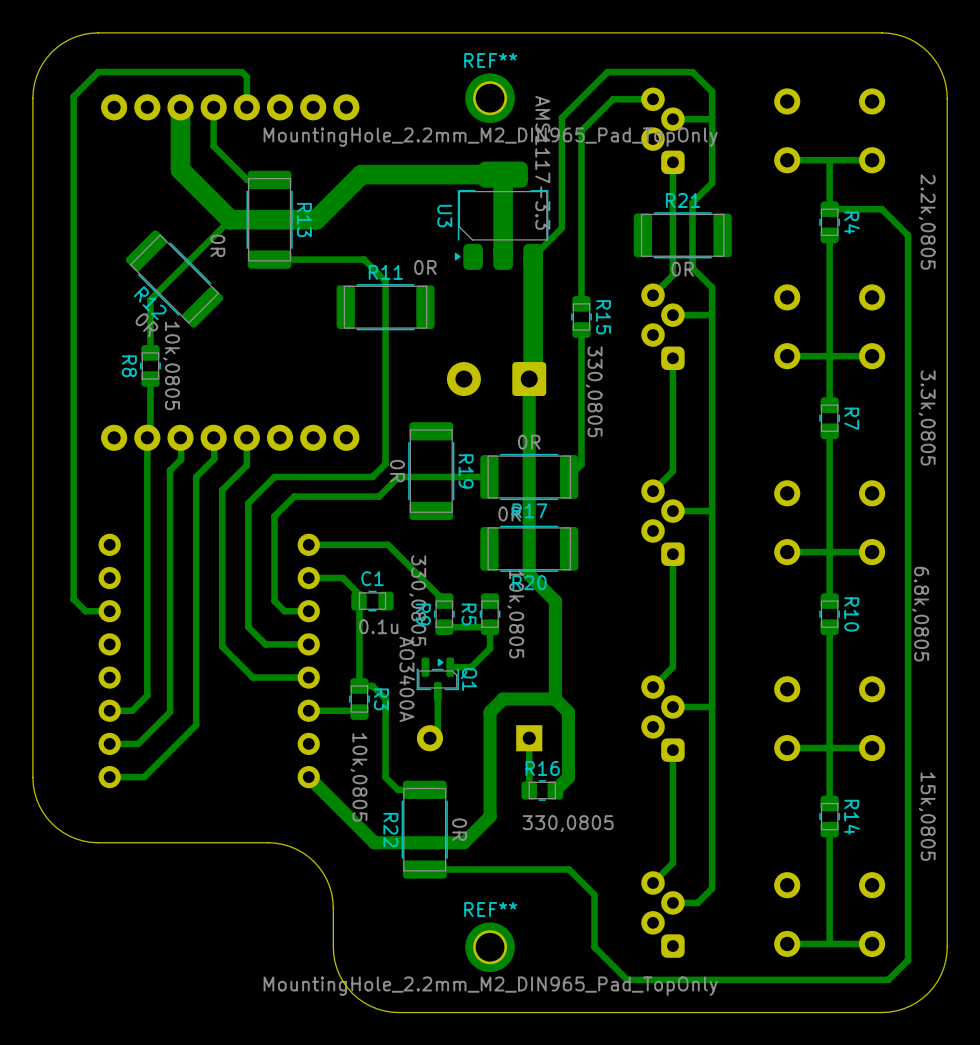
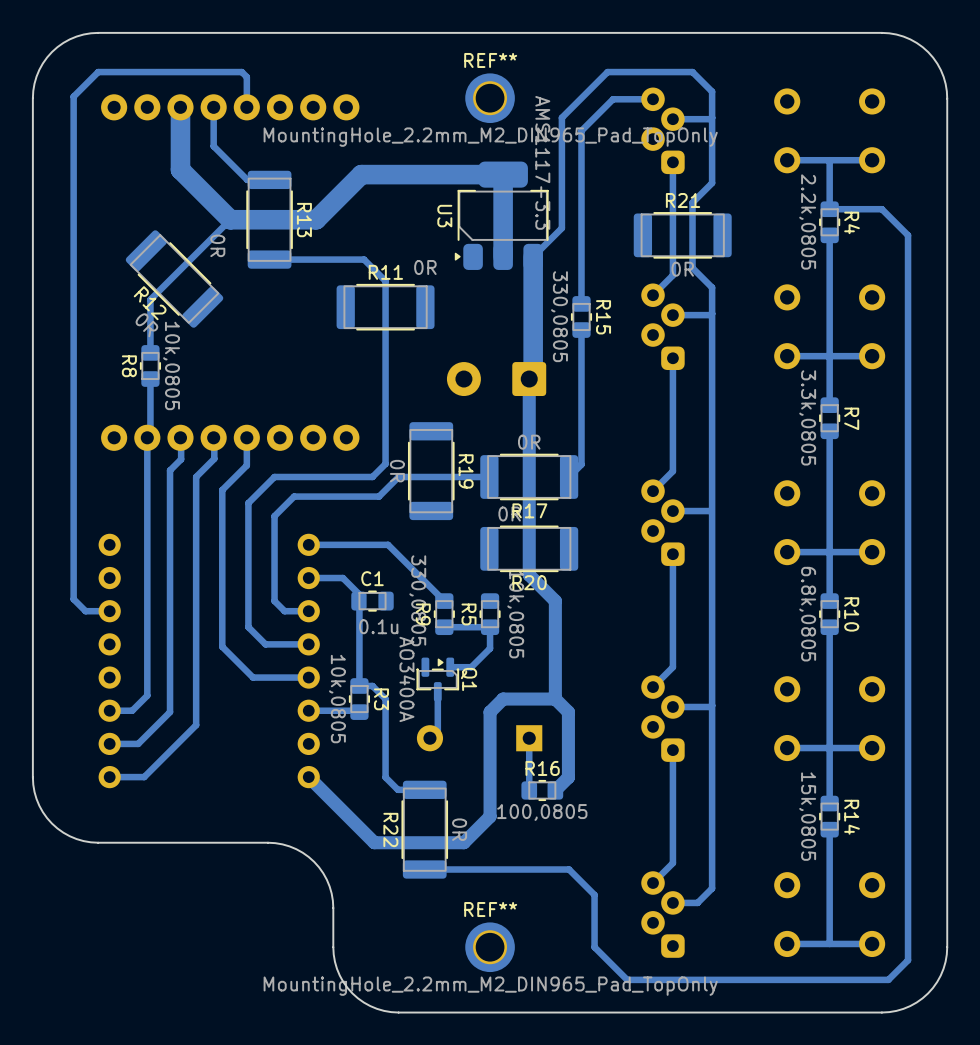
R4 value position: 2.2k,0805 (927, 221) -> 2.2k,0805 (807, 221)
R15 value position: 330,0805 (594, 391) -> 330,0805 (559, 316)
R7 value position: 3.3k,0805 (927, 417) -> 3.3k,0805 (807, 417)
R10 value position: 6.8k,0805 (920, 614) -> 6.8k,0805 (807, 614)
R3 value position: 10k,0805 (358, 777) -> 10k,0805 (337, 699)
R14 value position: 15k,0805 (927, 816) -> 15k,0805 (807, 816)
R16 value: 330,0805 (568, 823) -> 100,0805 (542, 812)

